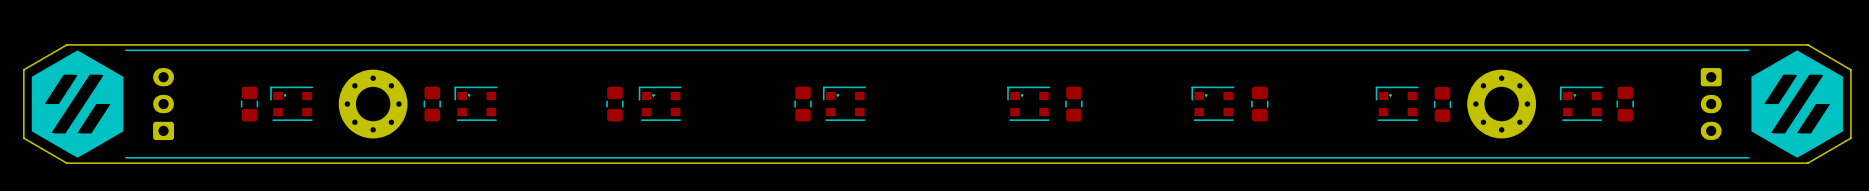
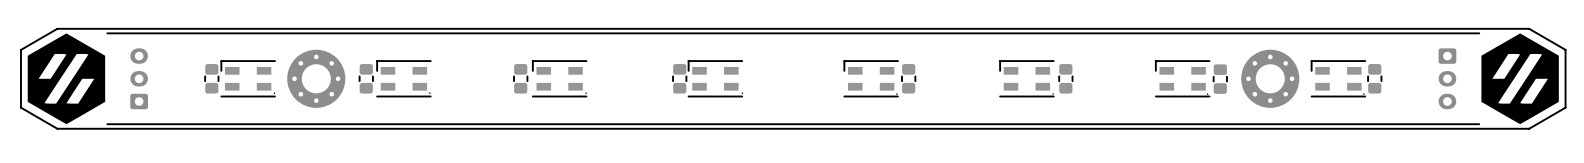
part footprint: [270, 86, 314, 121] -> [220, 60, 276, 98]
part footprint: [454, 86, 498, 121] -> [376, 60, 432, 98]
part footprint: [638, 86, 682, 121] -> [532, 60, 588, 98]
part footprint: [823, 86, 866, 121] -> [688, 60, 743, 98]
part footprint: [1007, 86, 1051, 121] -> [843, 60, 899, 98]
part footprint: [1191, 86, 1235, 121] -> [999, 60, 1055, 98]
part footprint: [1375, 86, 1419, 121] -> [1155, 60, 1211, 98]
part footprint: [1560, 86, 1603, 121] -> [1311, 60, 1366, 98]

